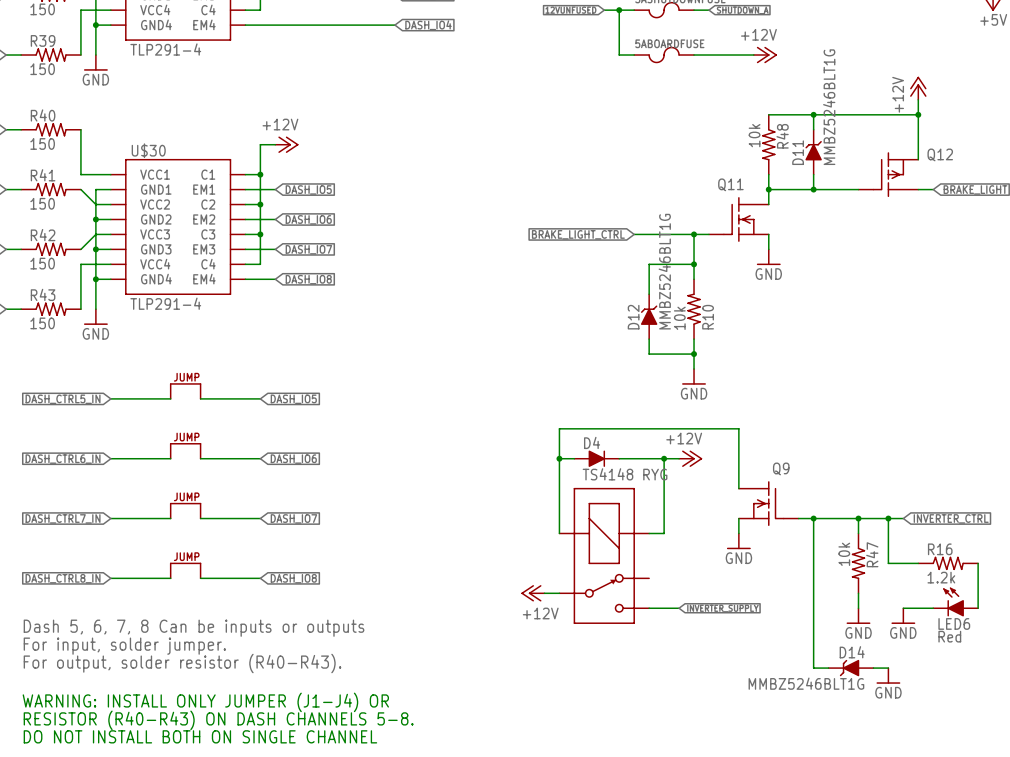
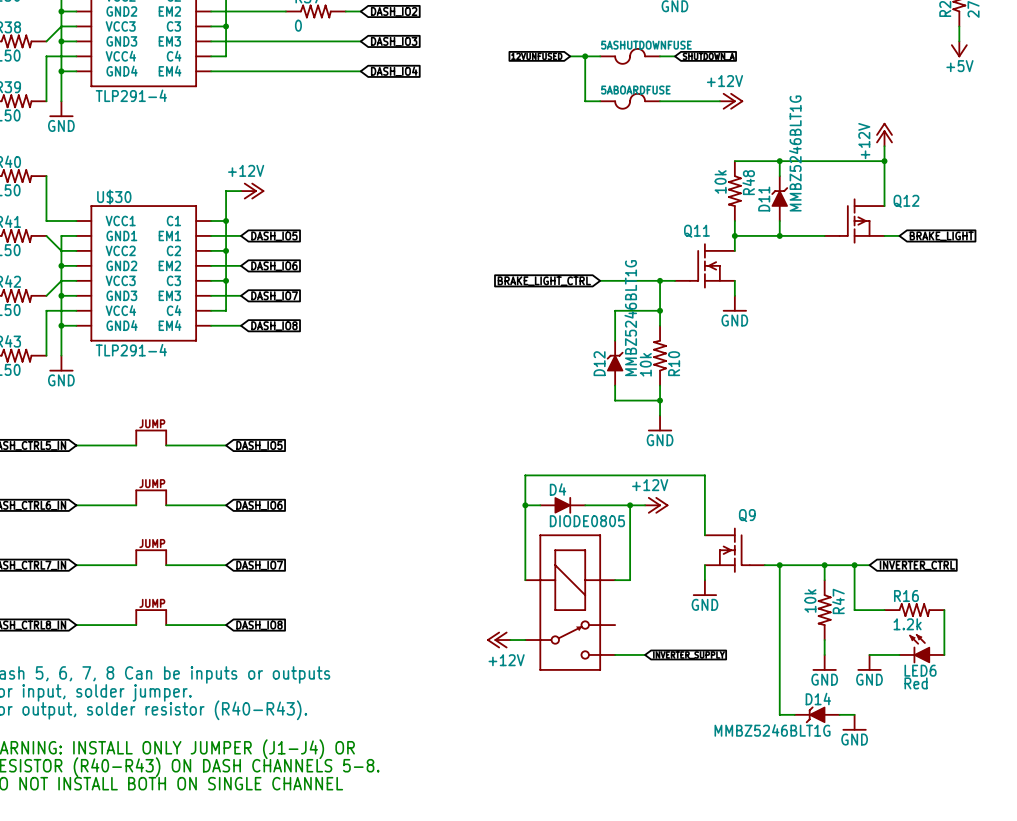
Q12 symbol: [858, 152, 919, 198] -> [824, 198, 885, 244]
D4 value: TS4148 RYG (625, 474) -> DIODE0805 (587, 521)

